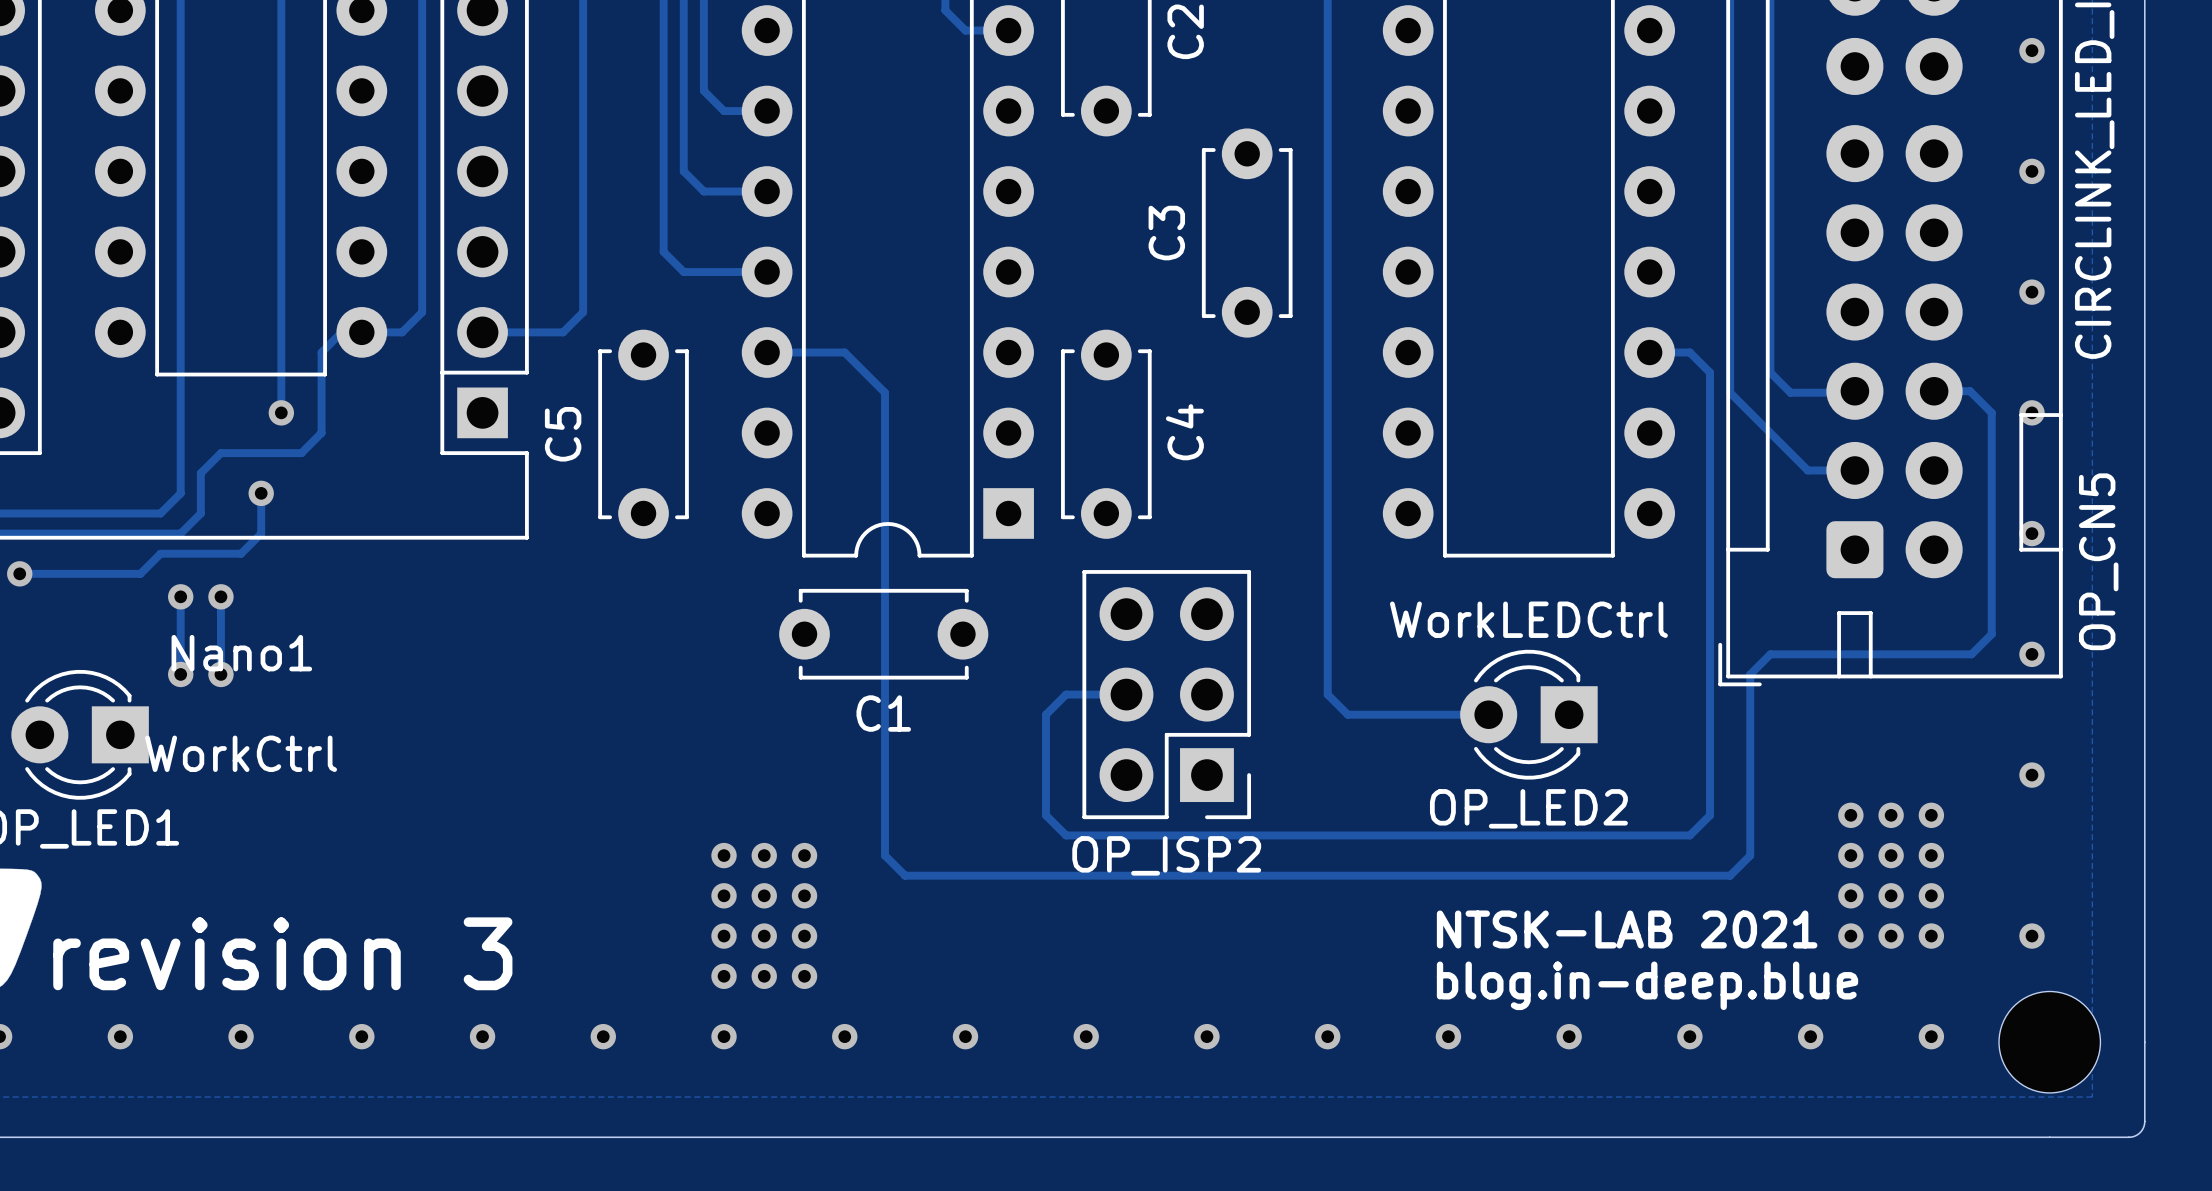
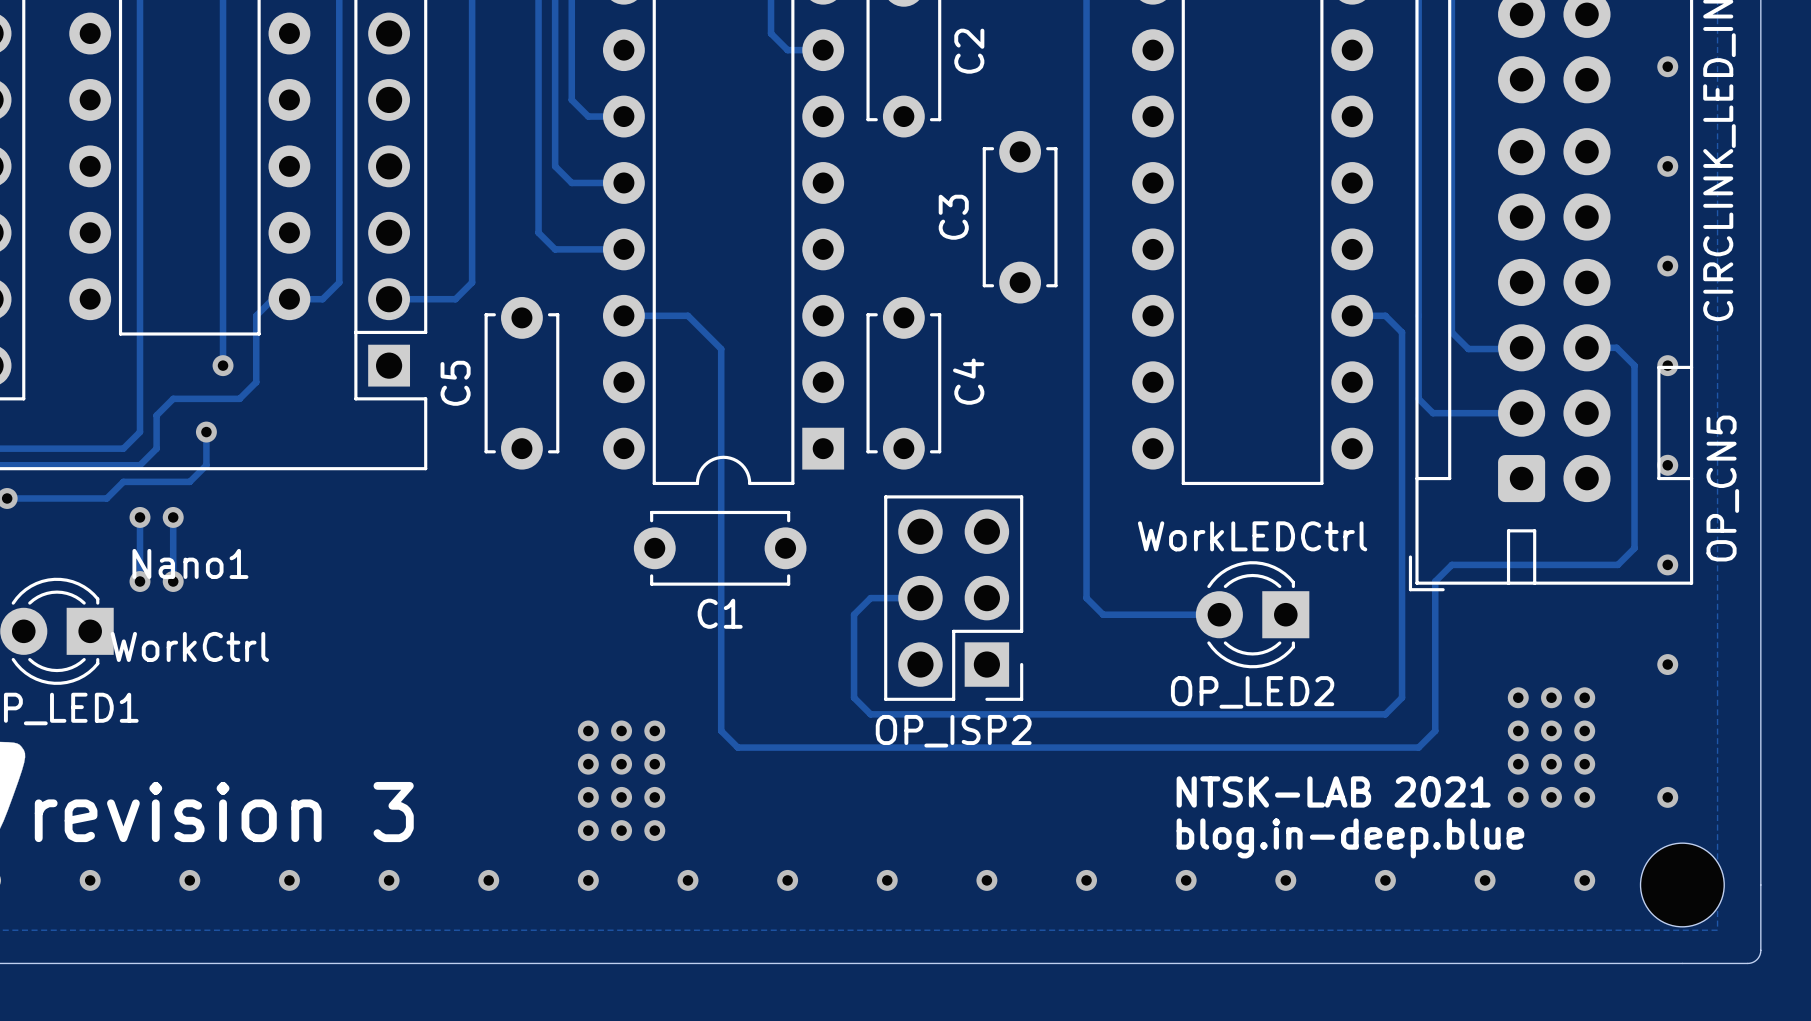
track: (1730, 392) (1807, 470) -> (1418, 349) (1418, 398) (1432, 413) (1482, 413)

